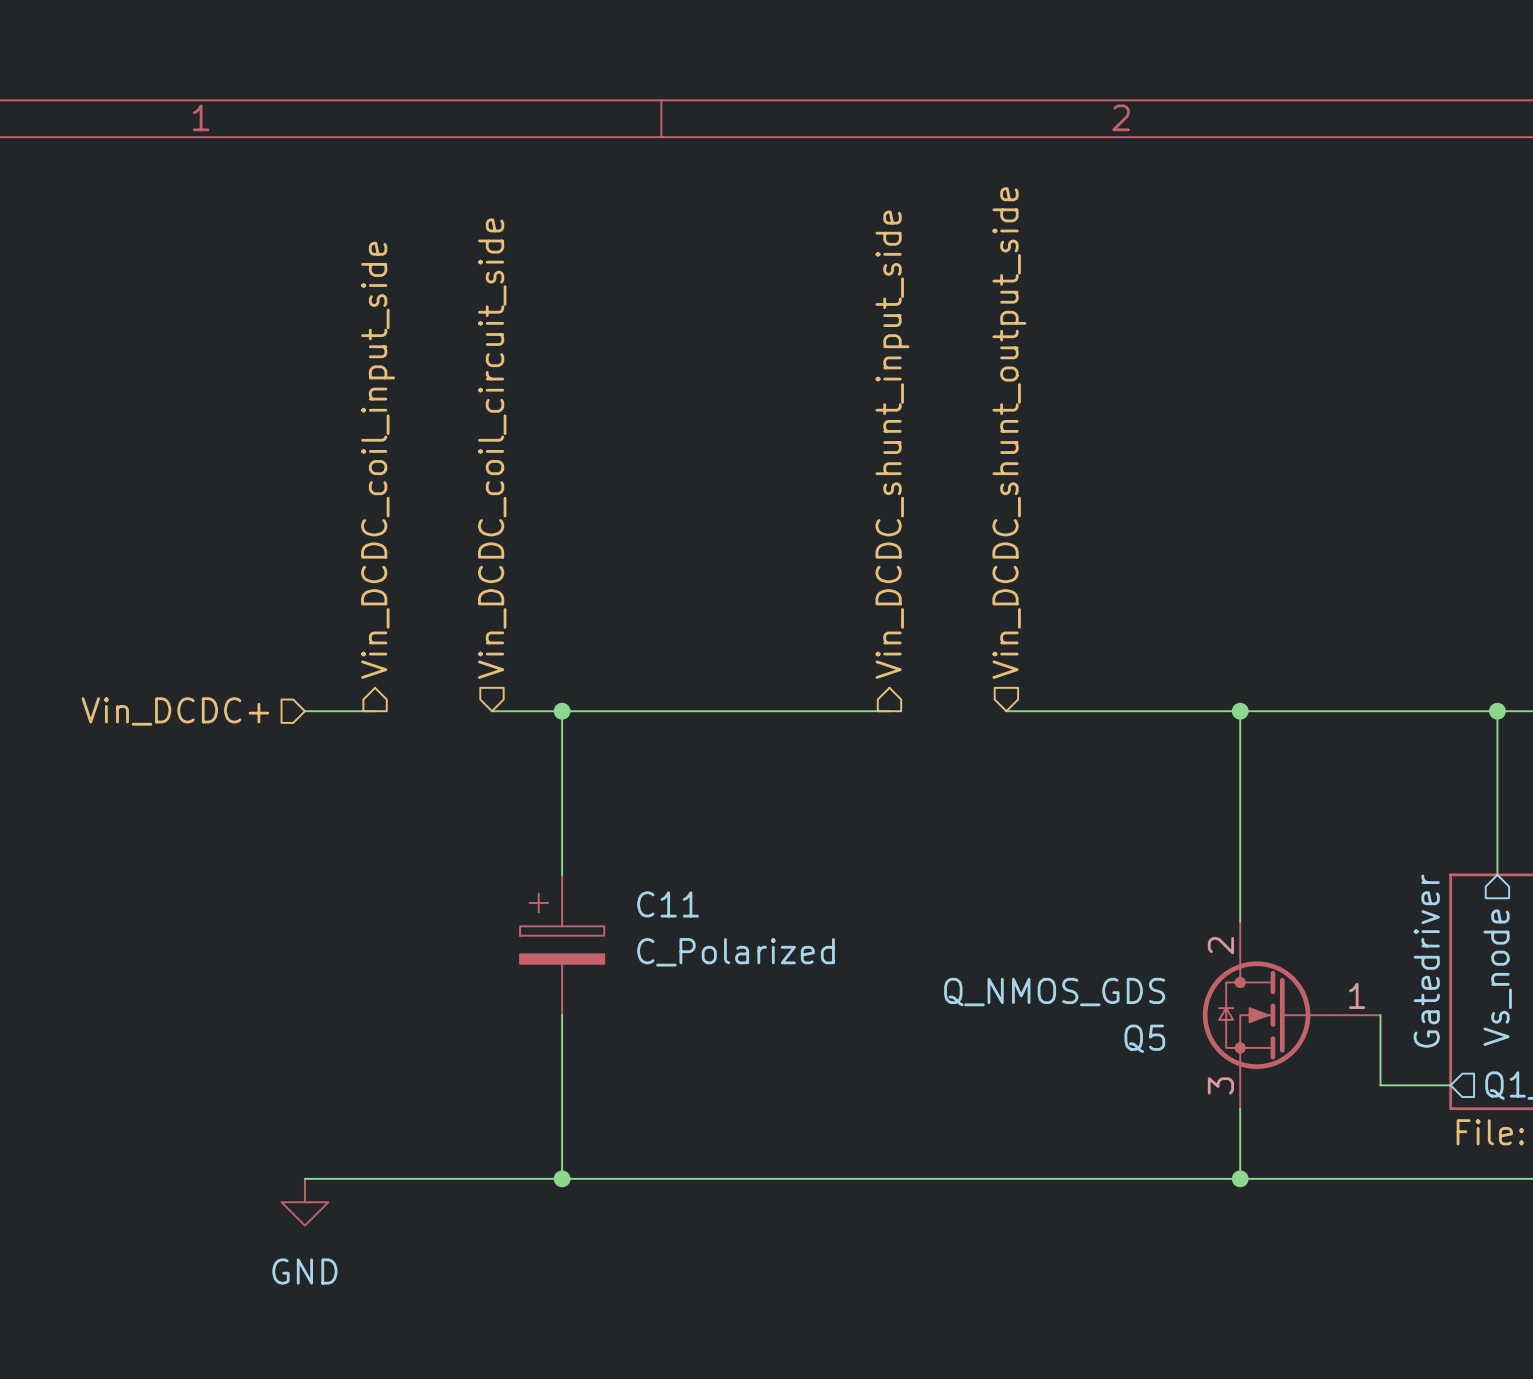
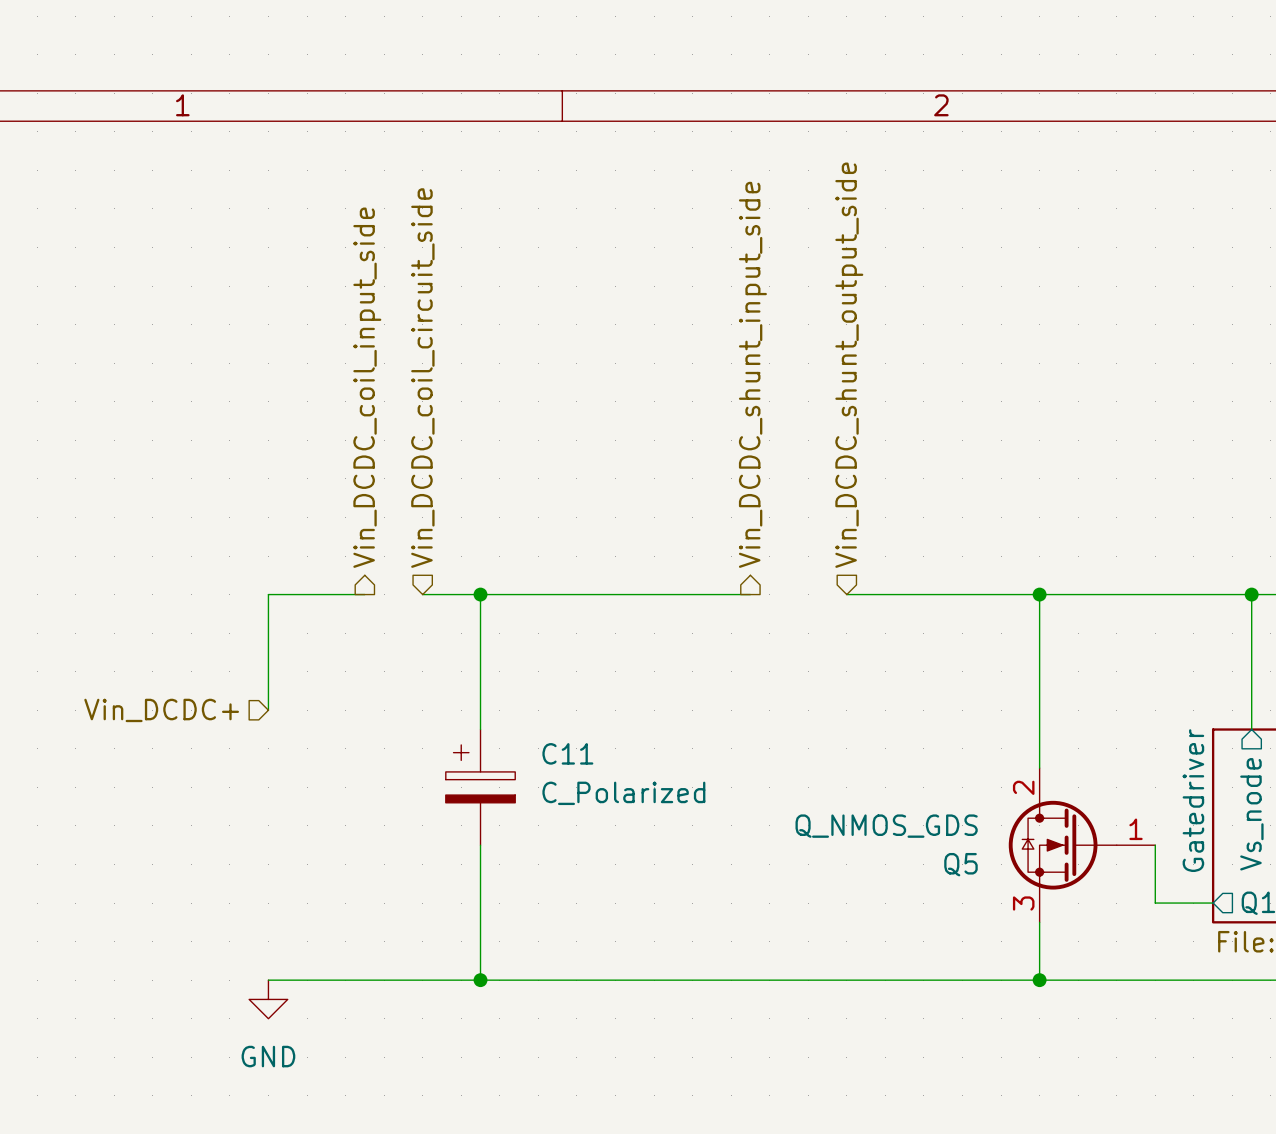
hierarchical label position: Vin_DCDC_coil_input_side (378, 460) -> Vin_DCDC_coil_input_side (367, 387)
hierarchical label position: Vin_DCDC+ (175, 711) -> Vin_DCDC+ (161, 710)
wire: none -> (268, 594) (268, 710)
wire: none -> (326, 594) (364, 594)

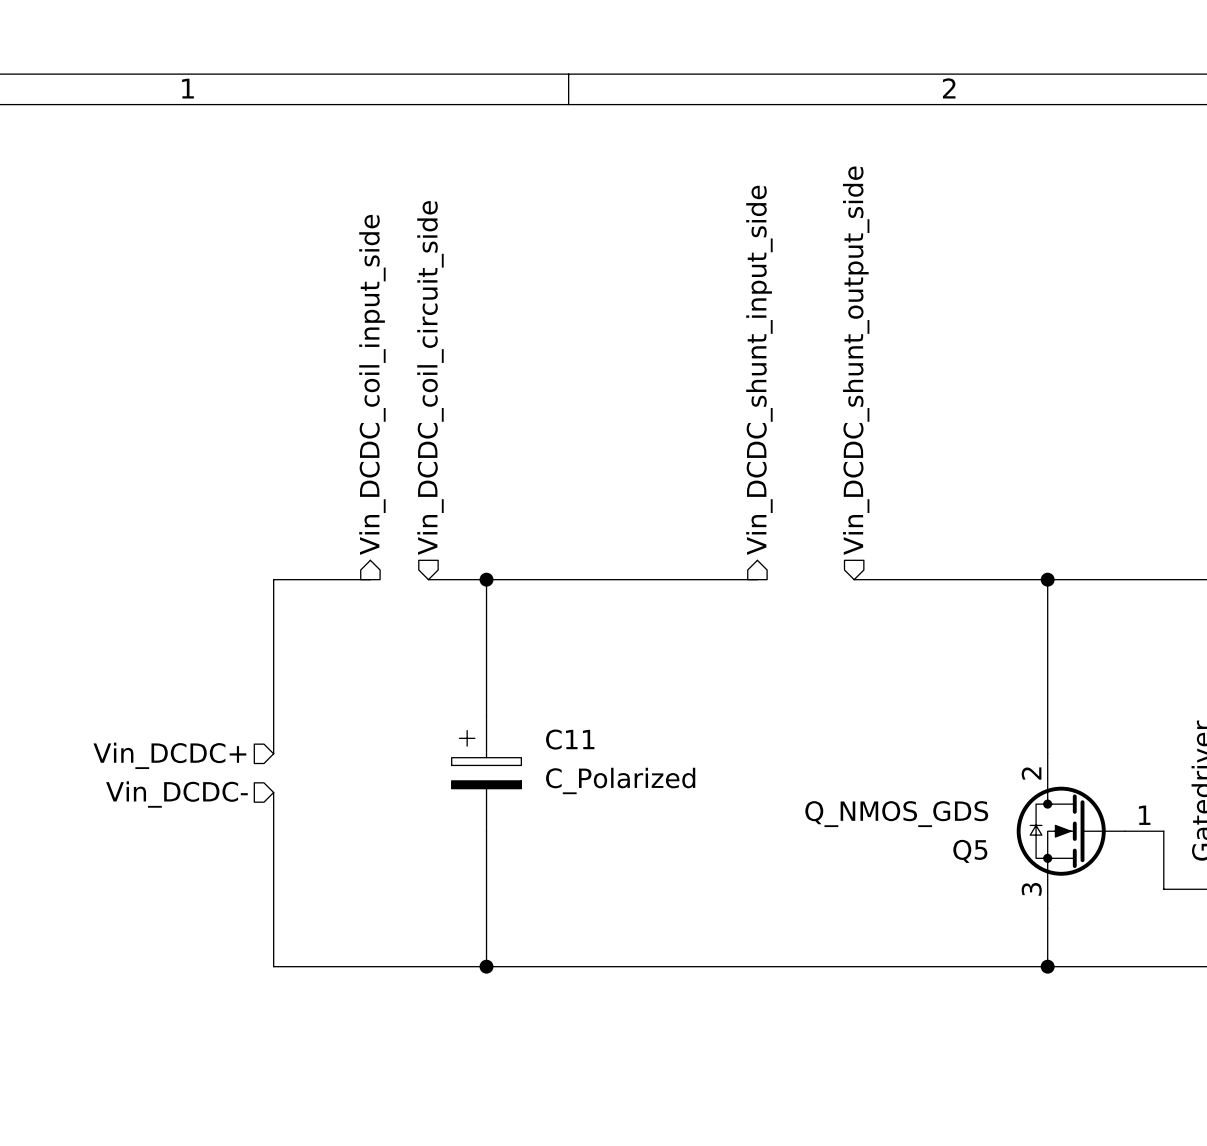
hierarchical label position: Vin_DCDC+ (161, 710) -> Vin_DCDC+ (169, 755)
wire: none -> (273, 695) (273, 753)
hierarchical label: none -> Vin_DCDC- (176, 794)
wire: none -> (273, 792) (273, 966)
power symbol: GND (268, 999) -> none

